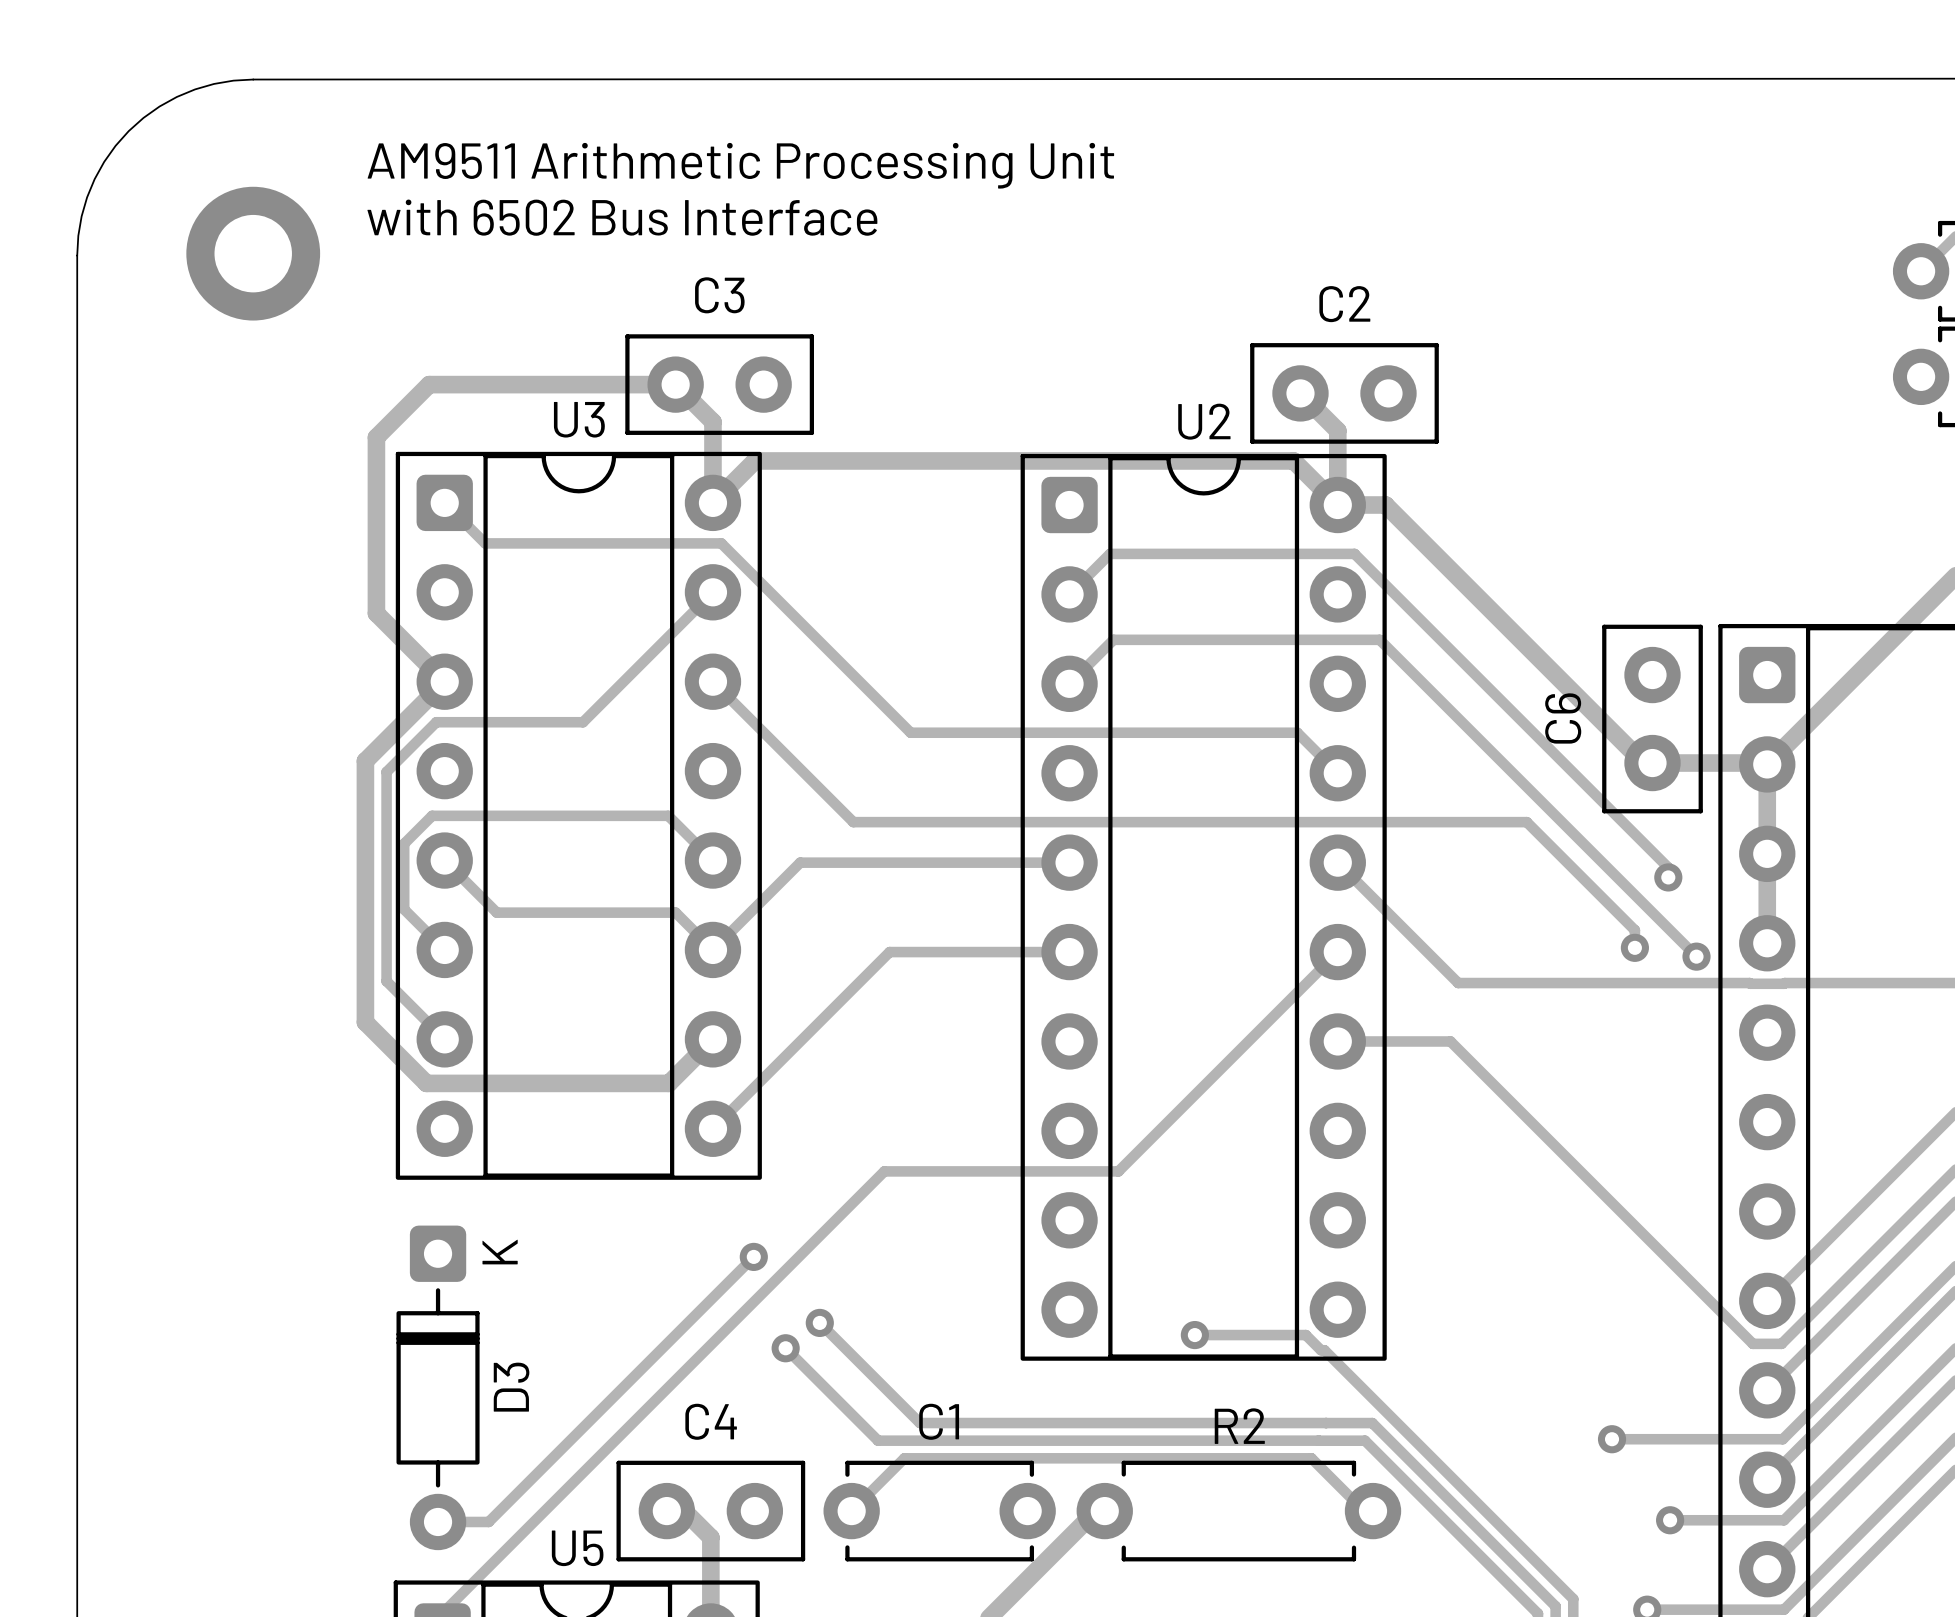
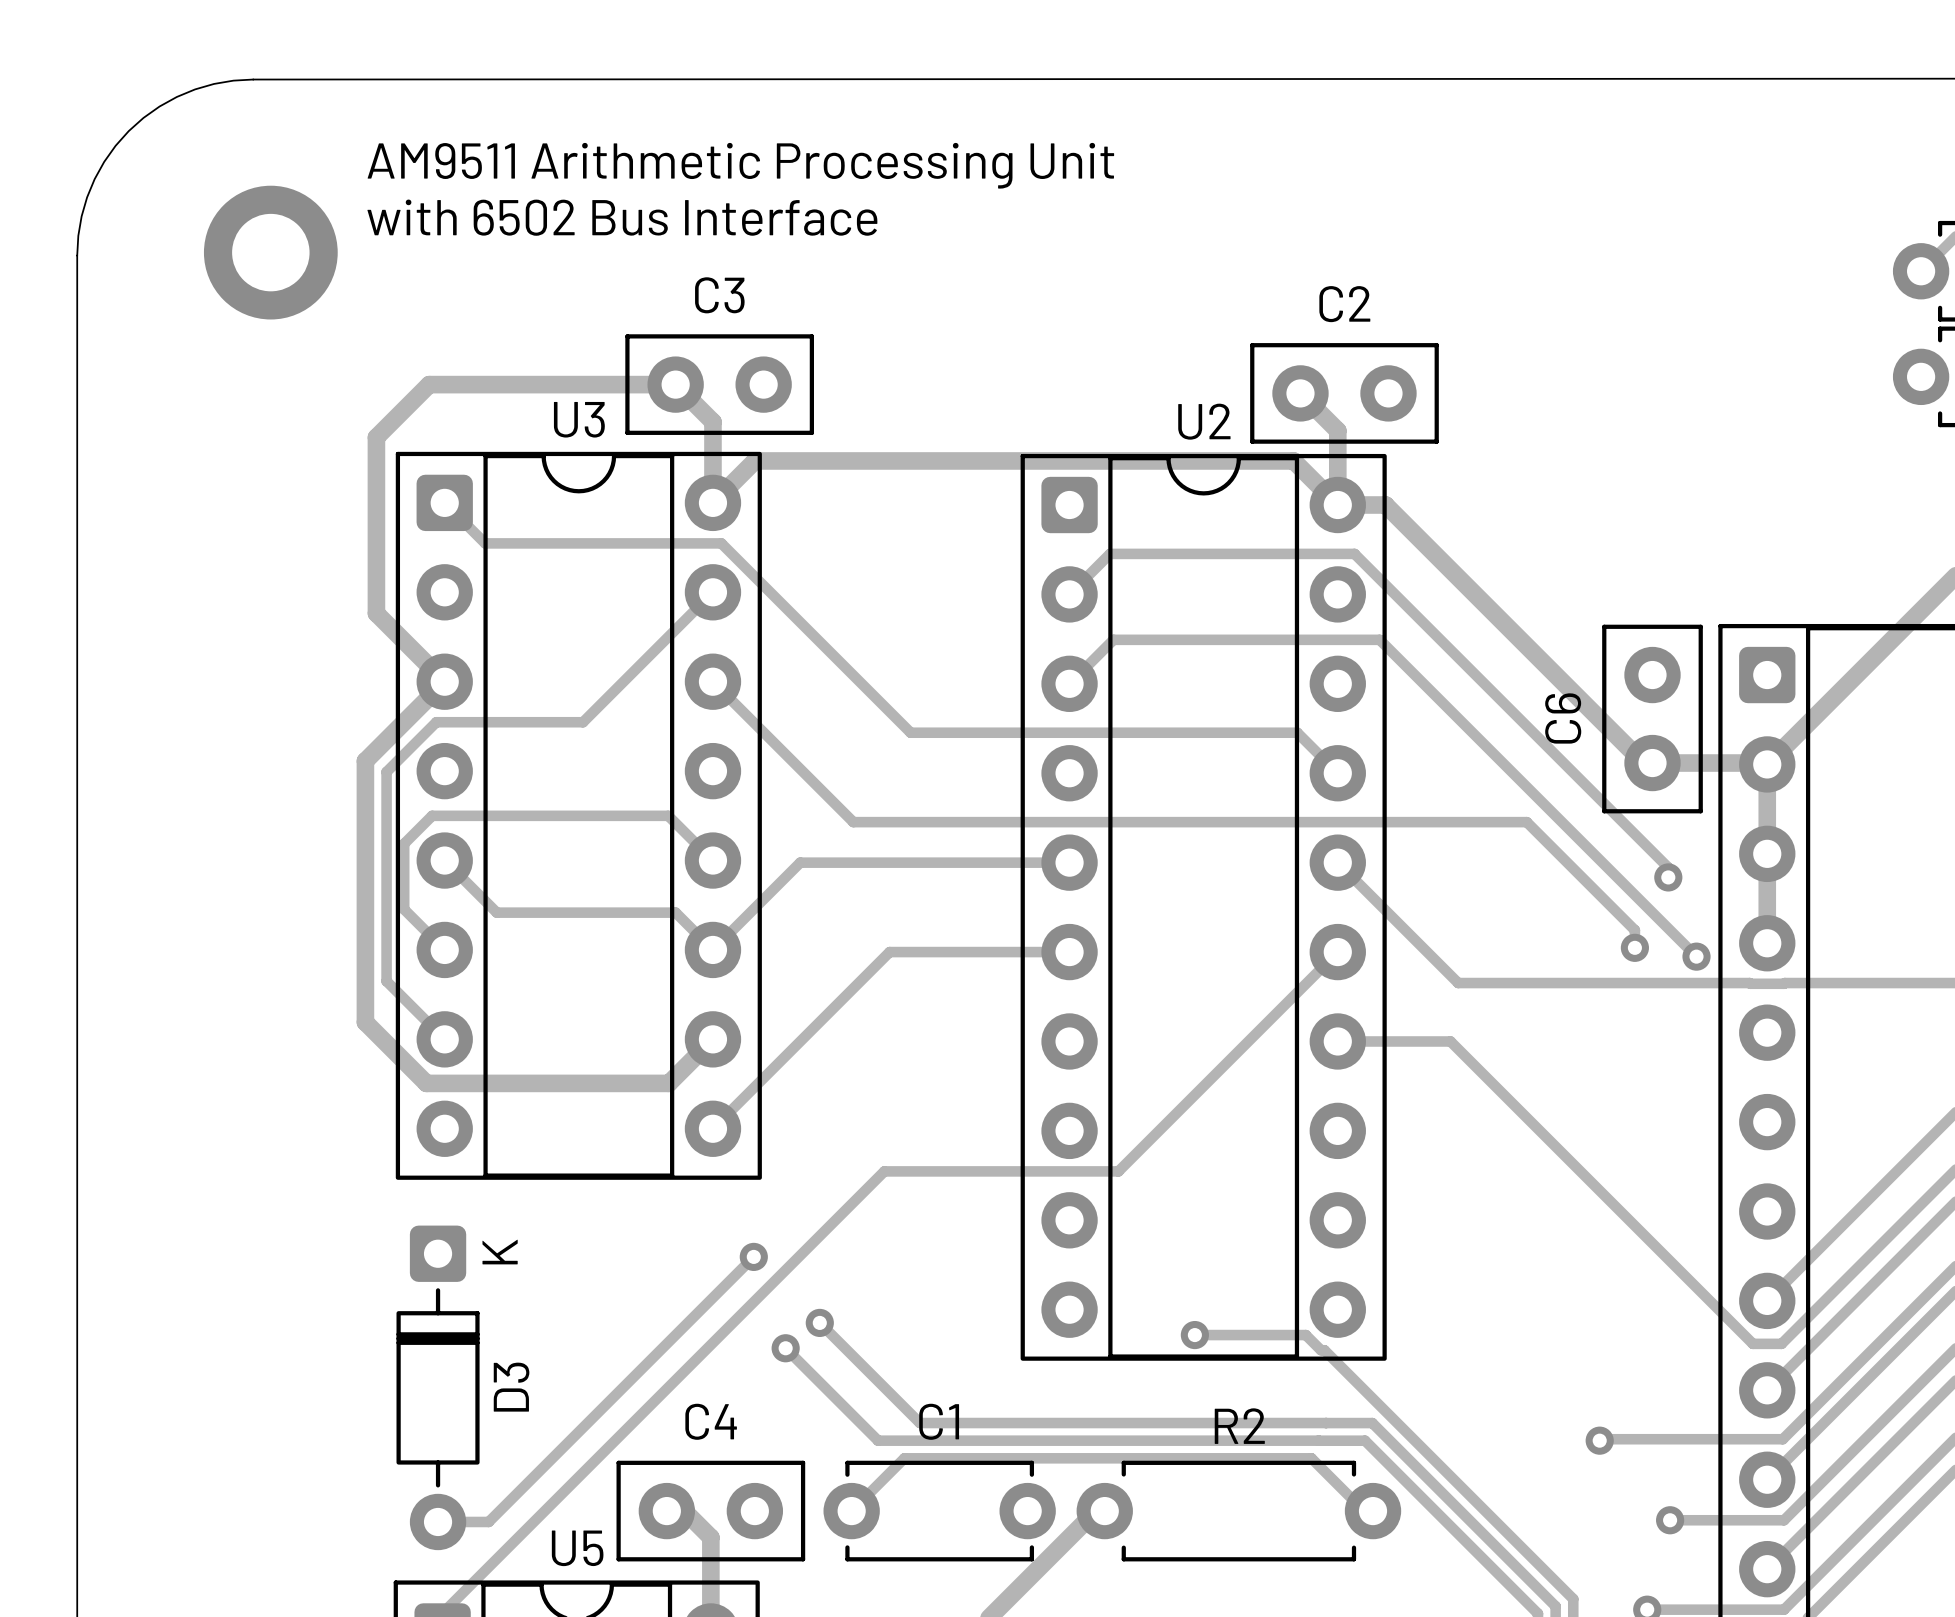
part position: (253, 253) -> (270, 252)
via position: (1612, 1439) -> (1599, 1440)

